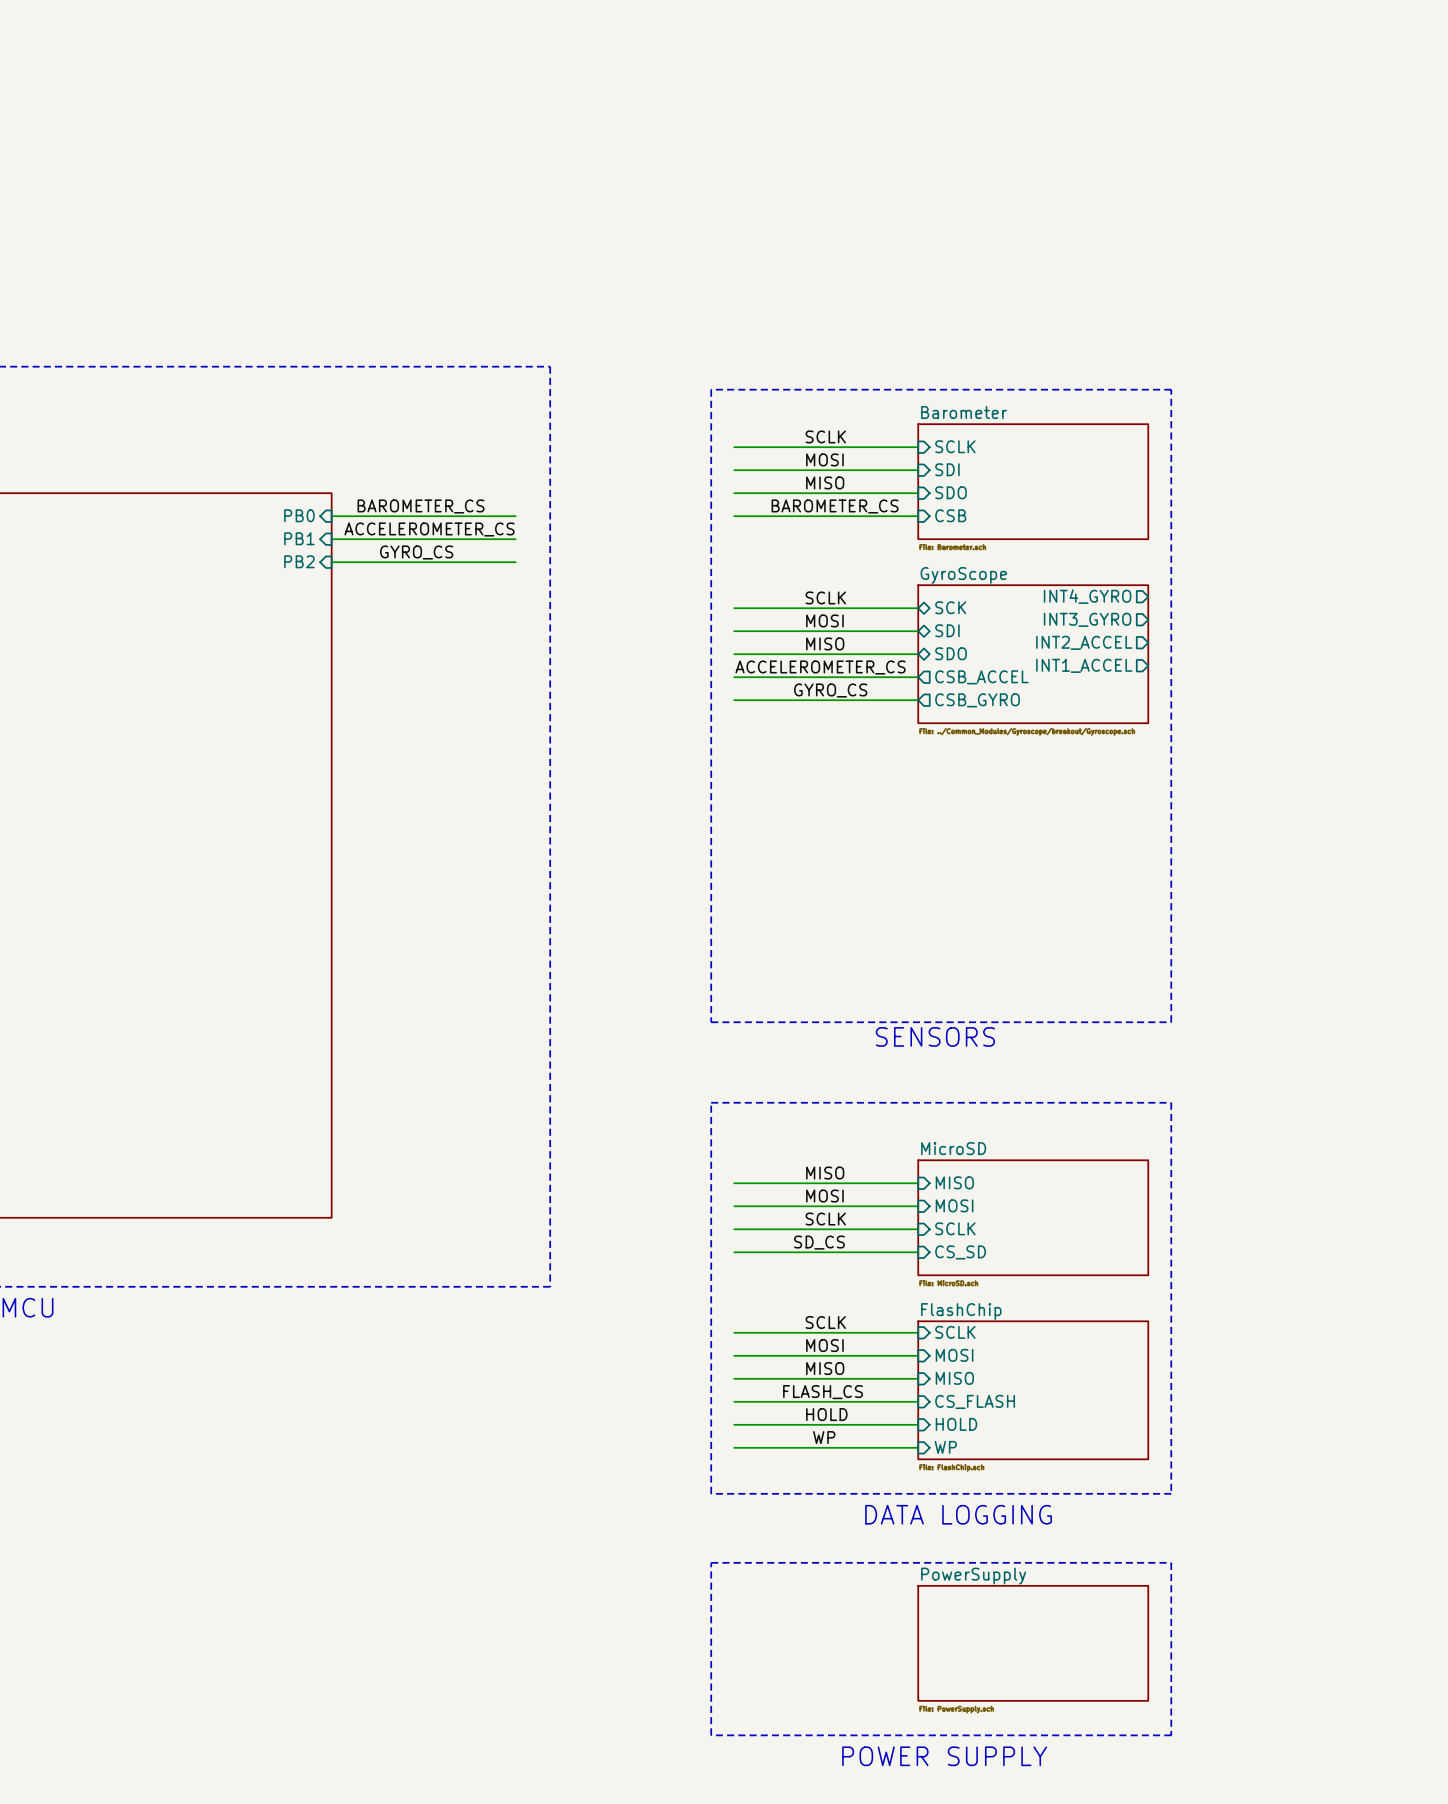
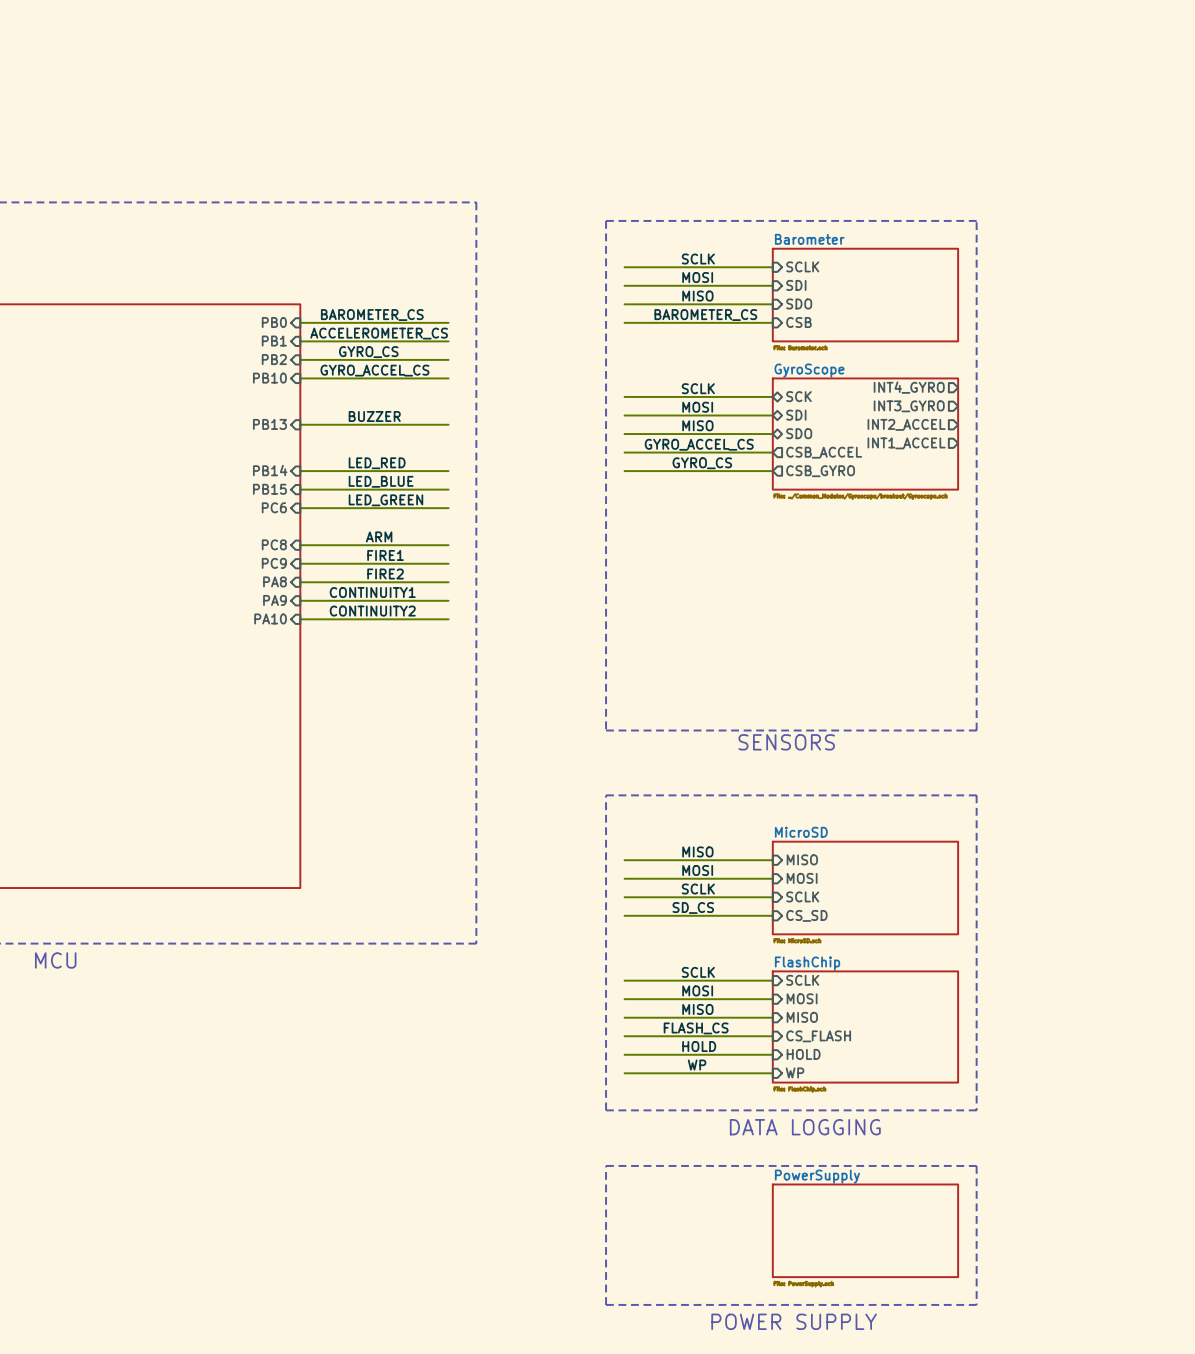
label: none -> GYRO_ACCEL_CS (374, 370)
sheet pin: none -> PB10 (269, 378)
wire: none -> (300, 378) (448, 378)
label: none -> BUZZER (374, 416)
sheet pin: none -> PB13 (269, 424)
wire: none -> (300, 424) (448, 424)
label: ACCELEROMETER_CS (820, 667) -> none
label: none -> GYRO_ACCEL_CS (699, 444)
label: none -> LED_RED (377, 463)
sheet pin: none -> PB14 (270, 470)
wire: none -> (300, 471) (448, 471)
label: none -> LED_BLUE (381, 481)
sheet pin: none -> PB15 (269, 489)
wire: none -> (300, 489) (448, 489)
label: none -> LED_GREEN (385, 500)
sheet pin: none -> PC6 (274, 507)
wire: none -> (300, 508) (448, 508)
label: none -> ARM (379, 536)
sheet pin: none -> PC8 (274, 544)
wire: none -> (300, 545) (448, 545)
label: none -> FIRE1 (385, 555)
sheet pin: none -> PC9 (274, 563)
wire: none -> (300, 563) (448, 563)
label: none -> FIRE2 (385, 574)
sheet pin: none -> PA8 (275, 581)
wire: none -> (300, 582) (448, 582)
label: none -> CONTINUITY1 (372, 592)
sheet pin: none -> PA9 (275, 600)
wire: none -> (300, 600) (448, 600)
label: none -> CONTINUITY2 (372, 611)
sheet pin: none -> PA10 (270, 618)
wire: none -> (300, 619) (448, 619)

